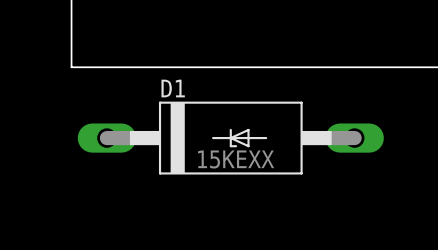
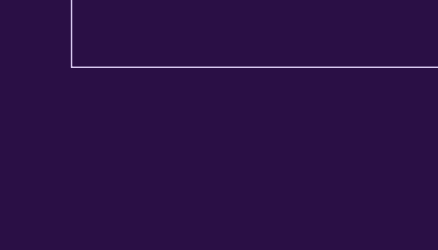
D1: 15KEXX (230, 138) -> none

